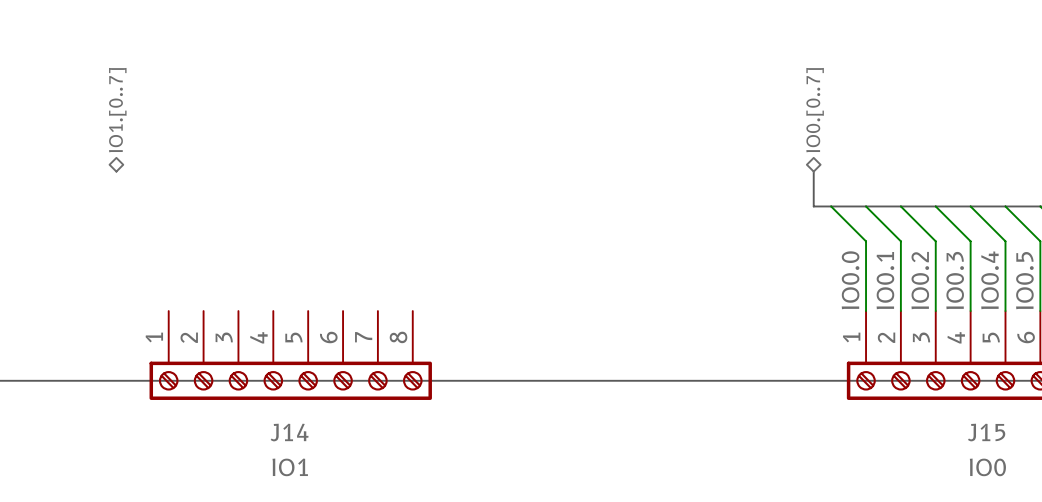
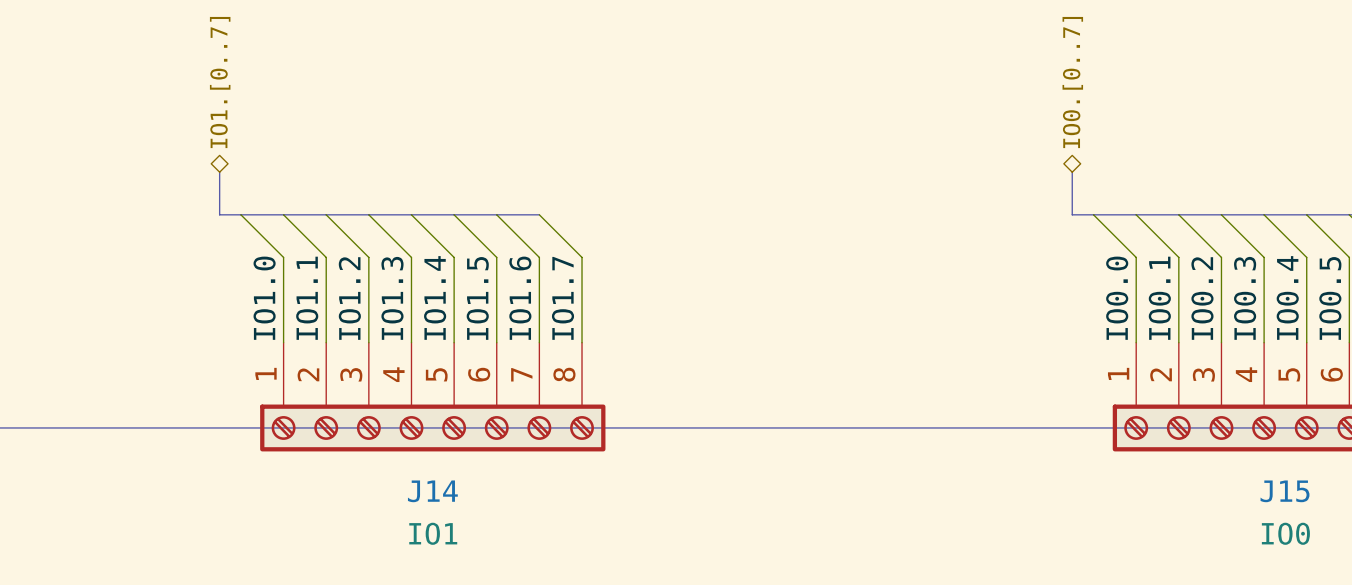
bus: none -> (219, 172) (219, 214) (539, 214)
wire: none -> (240, 214) (283, 257) (283, 342)
wire: none -> (283, 214) (326, 257) (326, 342)
wire: none -> (326, 214) (368, 257) (368, 342)
wire: none -> (368, 214) (411, 257) (411, 342)
wire: none -> (411, 214) (454, 257) (454, 342)
wire: none -> (454, 214) (496, 257) (496, 342)
wire: none -> (496, 214) (539, 257) (539, 342)
wire: none -> (539, 214) (582, 257) (582, 342)
label: none -> IO1.0 (264, 298)
label: none -> IO1.1 (307, 298)
label: none -> IO1.2 (349, 298)
label: none -> IO1.3 (392, 298)
label: none -> IO1.4 (435, 297)
label: none -> IO1.5 (477, 298)
label: none -> IO1.6 (520, 298)
label: none -> IO1.7 (563, 298)

